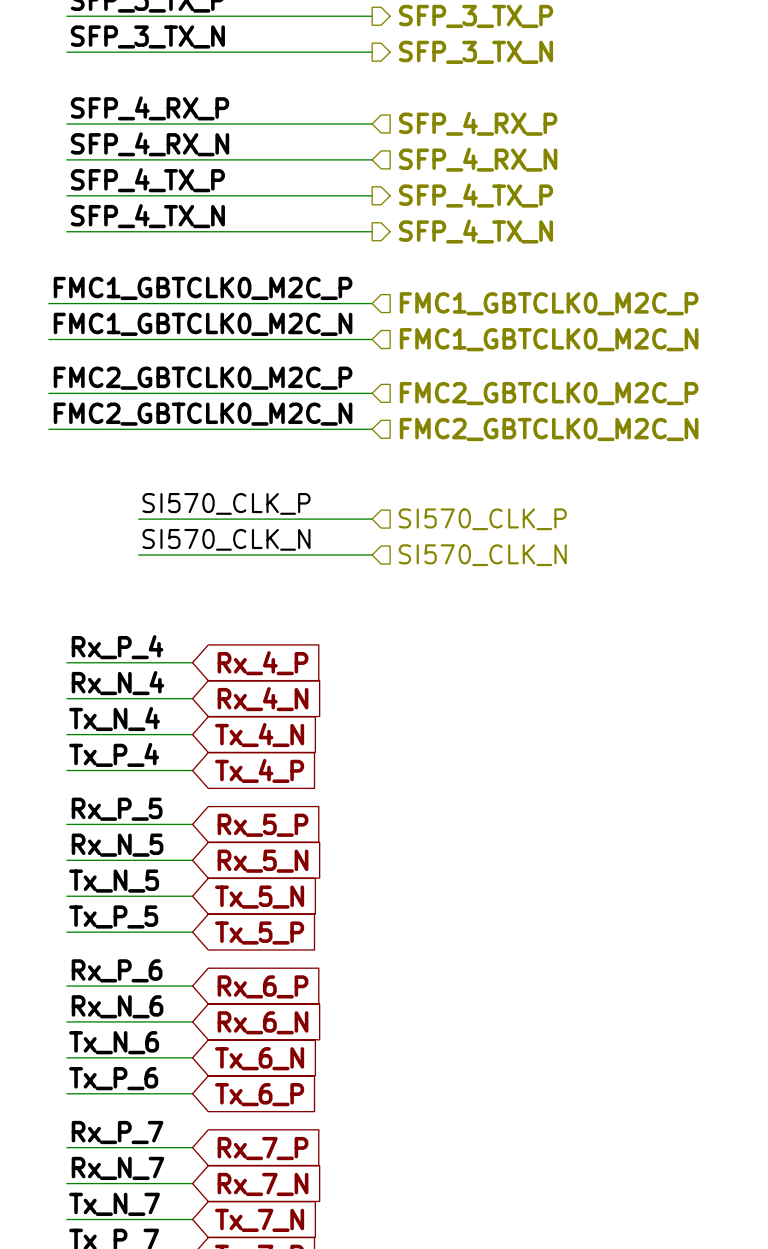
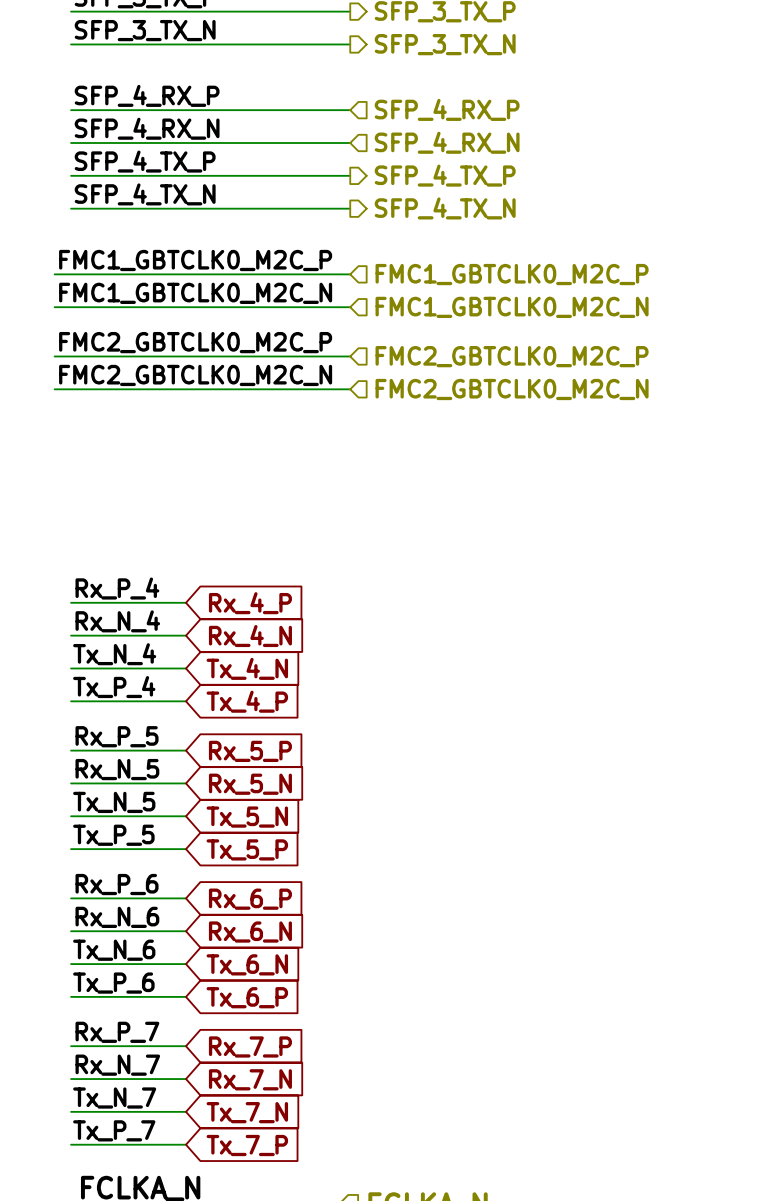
label: SI570_CLK_P (226, 503) -> none
wire: (138, 519) (372, 519) -> none
hierarchical label: SI570_CLK_P (482, 519) -> none
label: SI570_CLK_N (226, 539) -> none
wire: (138, 555) (372, 555) -> none
hierarchical label: SI570_CLK_N (482, 555) -> none

